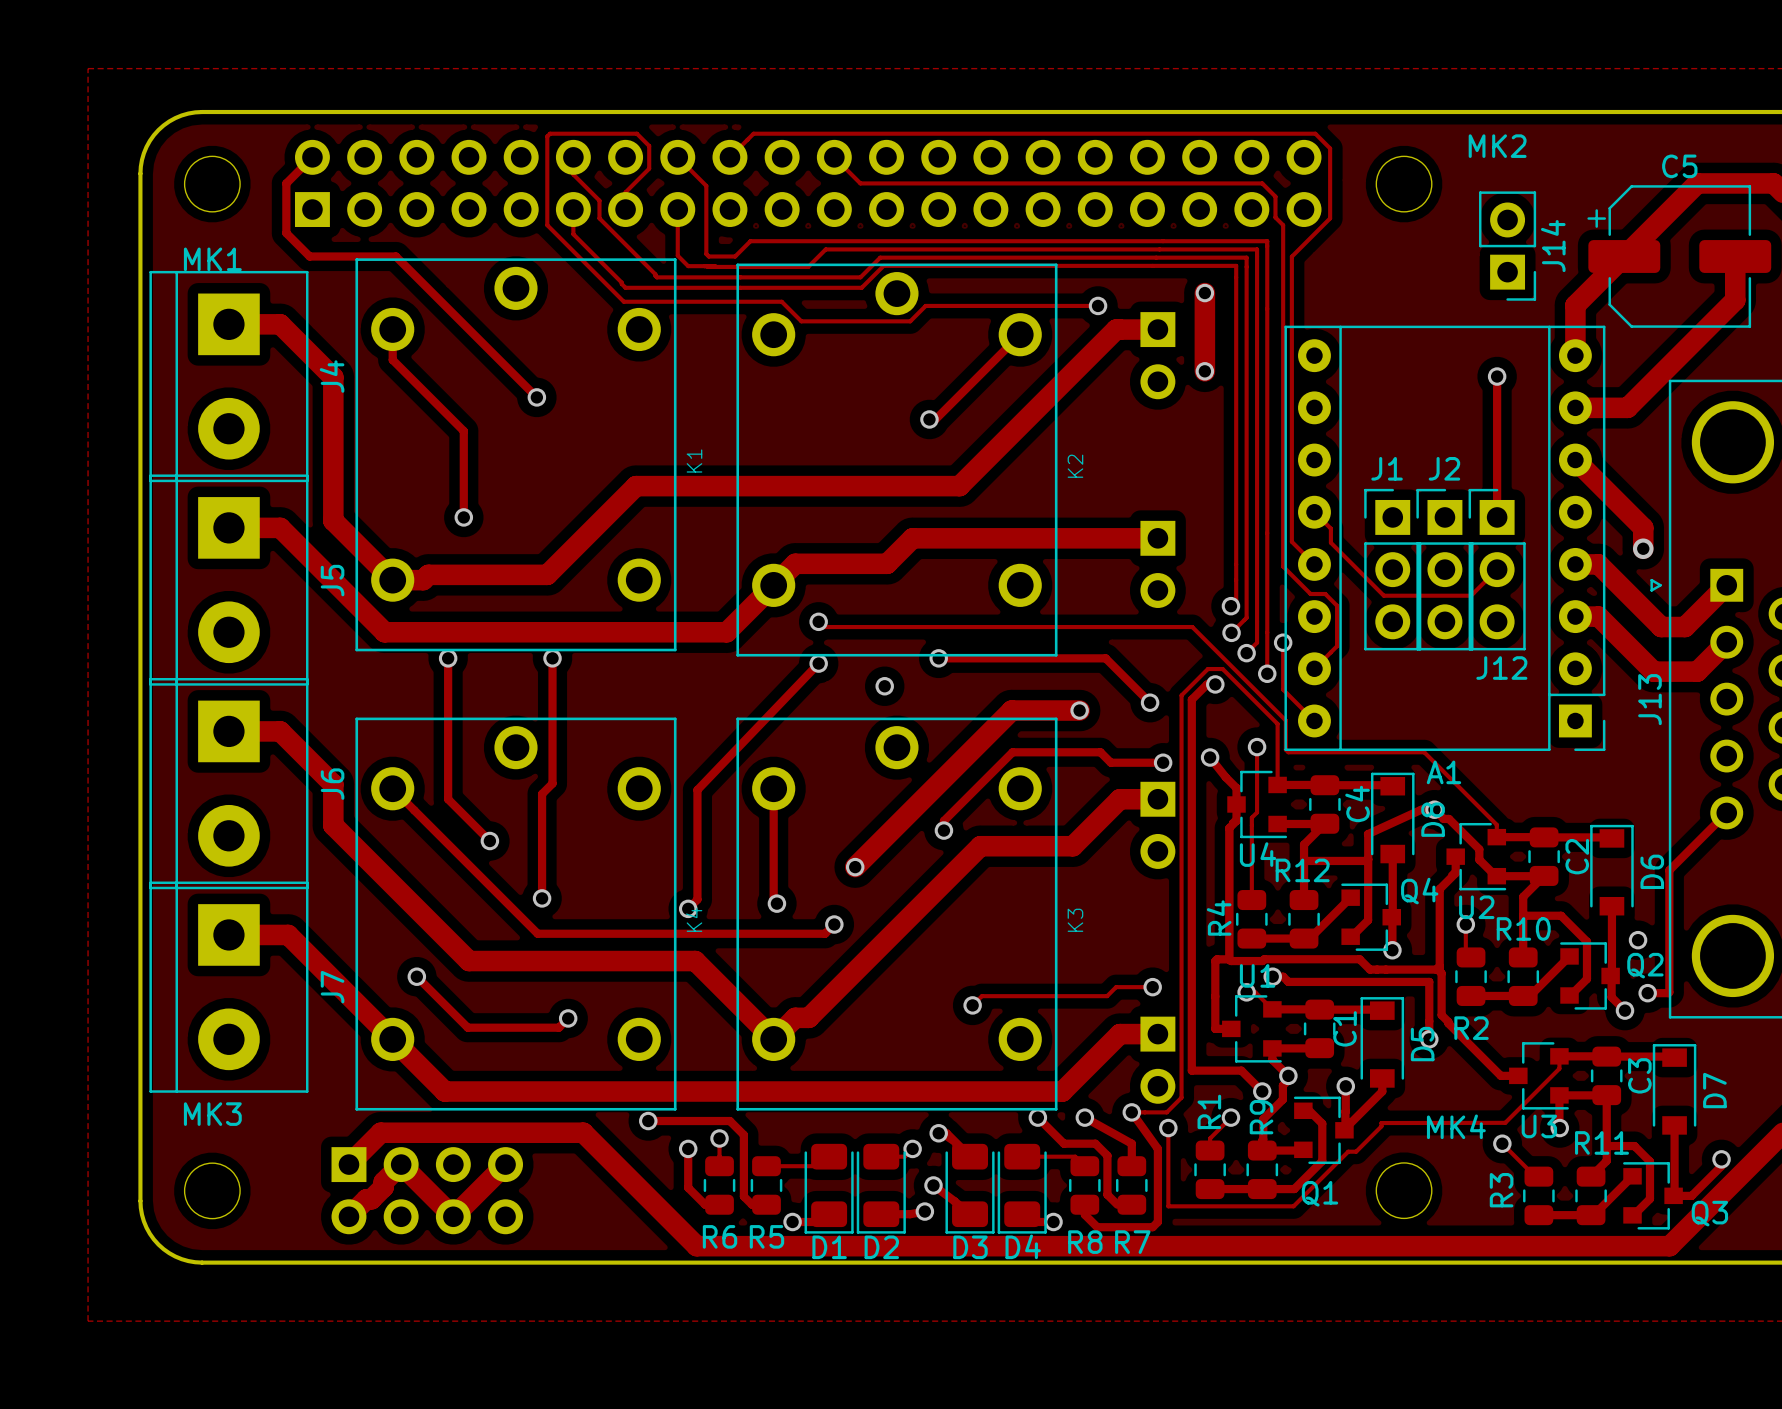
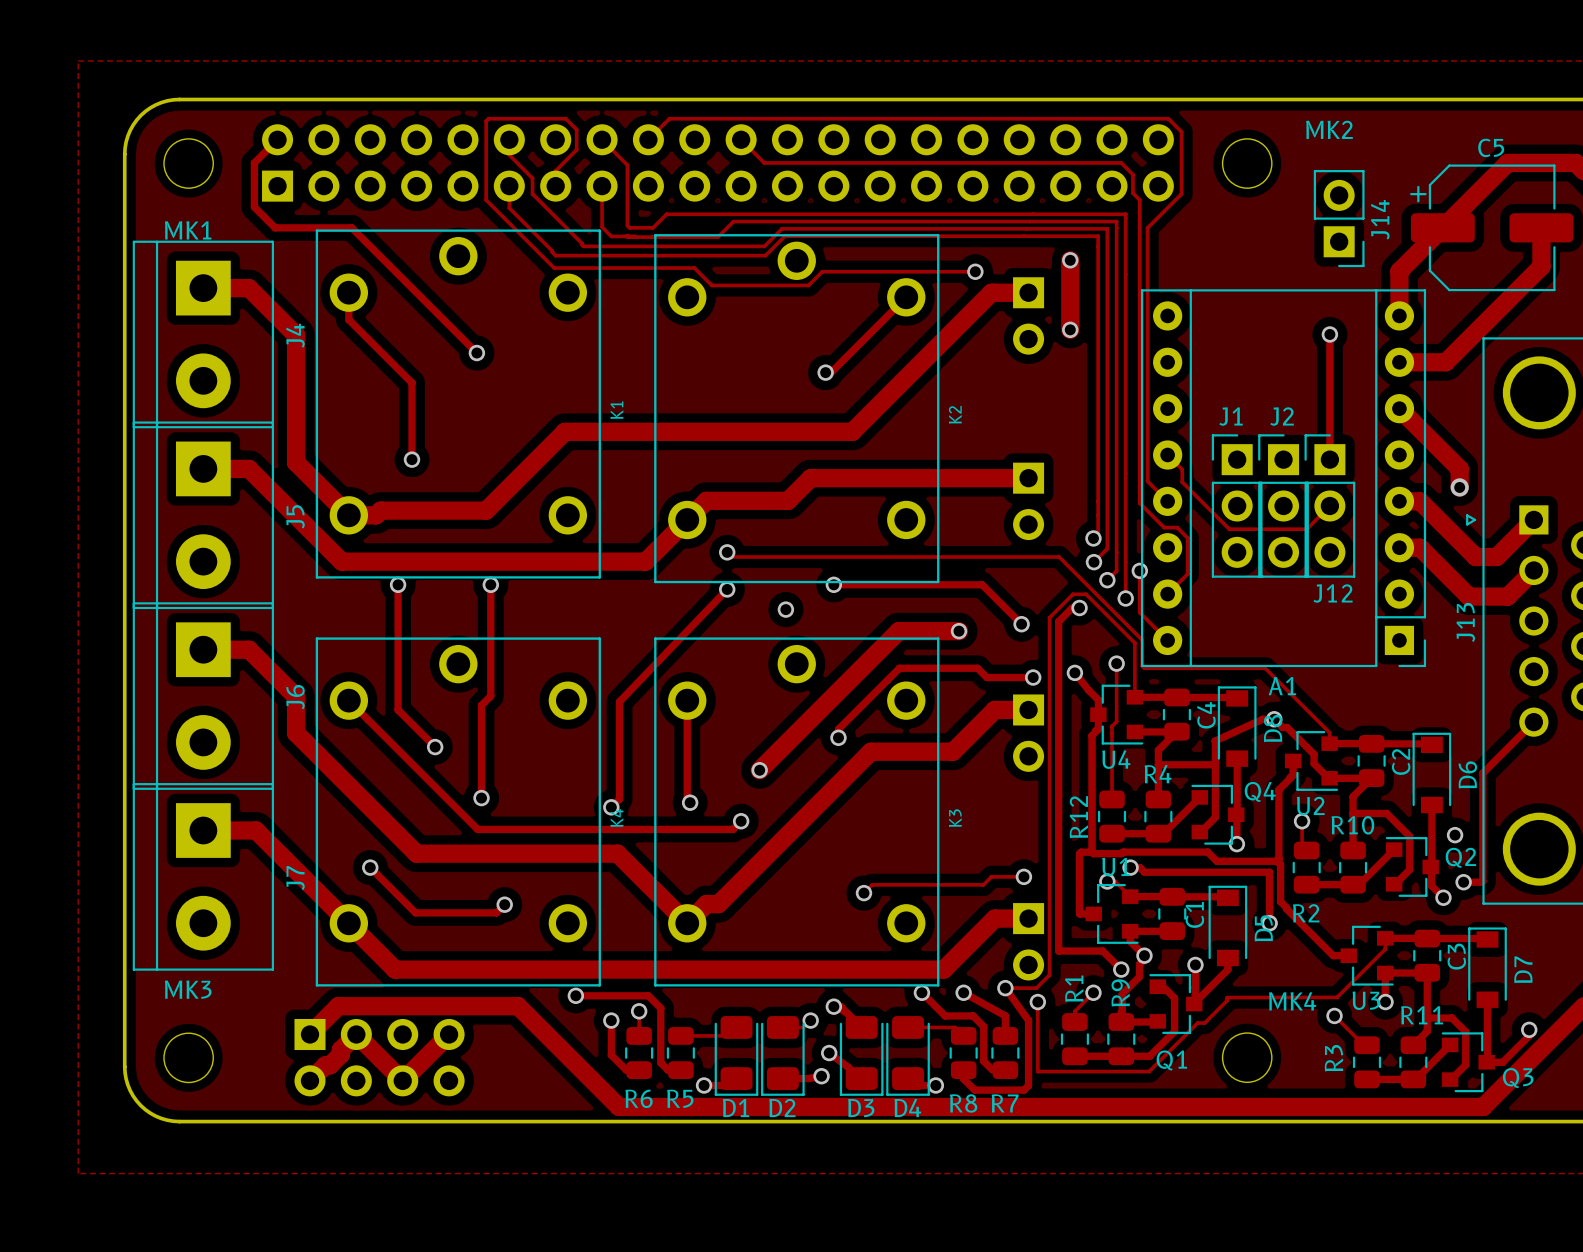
R12 name rotation: 0° (1302, 870) -> 90° counterclockwise (1078, 817)
R12 name position: R12 (1302, 870) -> R12 (1078, 817)
R4 name rotation: 0° (1219, 918) -> 90° clockwise (1158, 774)
R4 name position: R4 (1219, 918) -> R4 (1158, 774)

